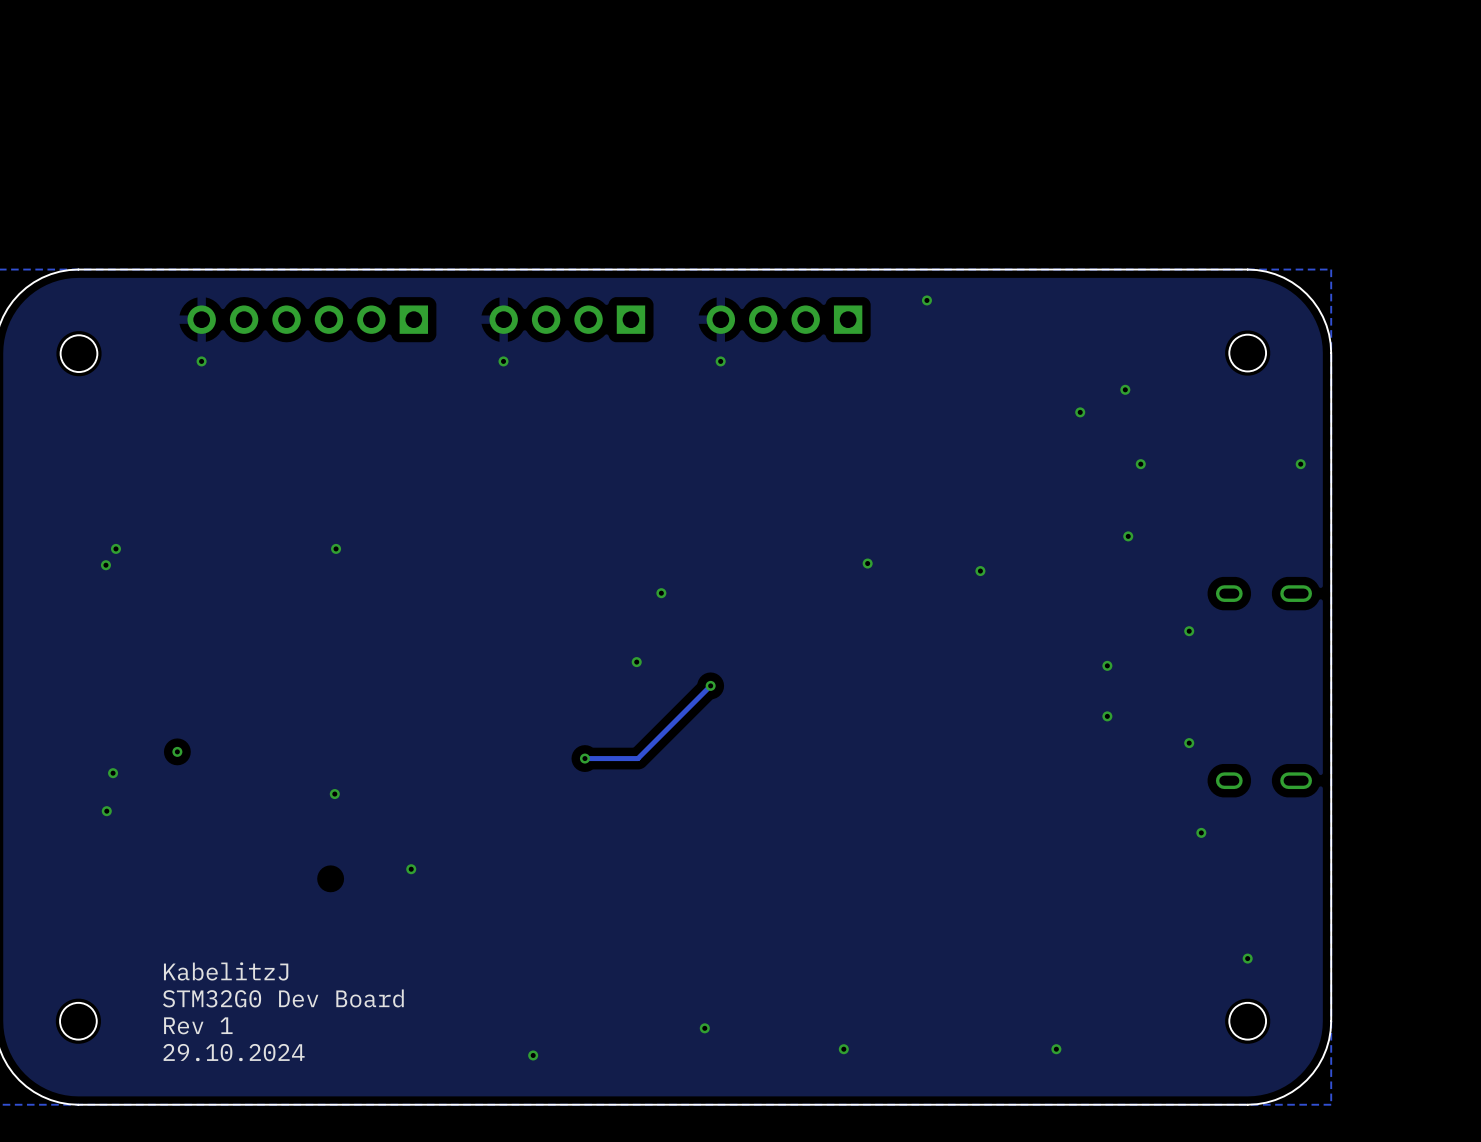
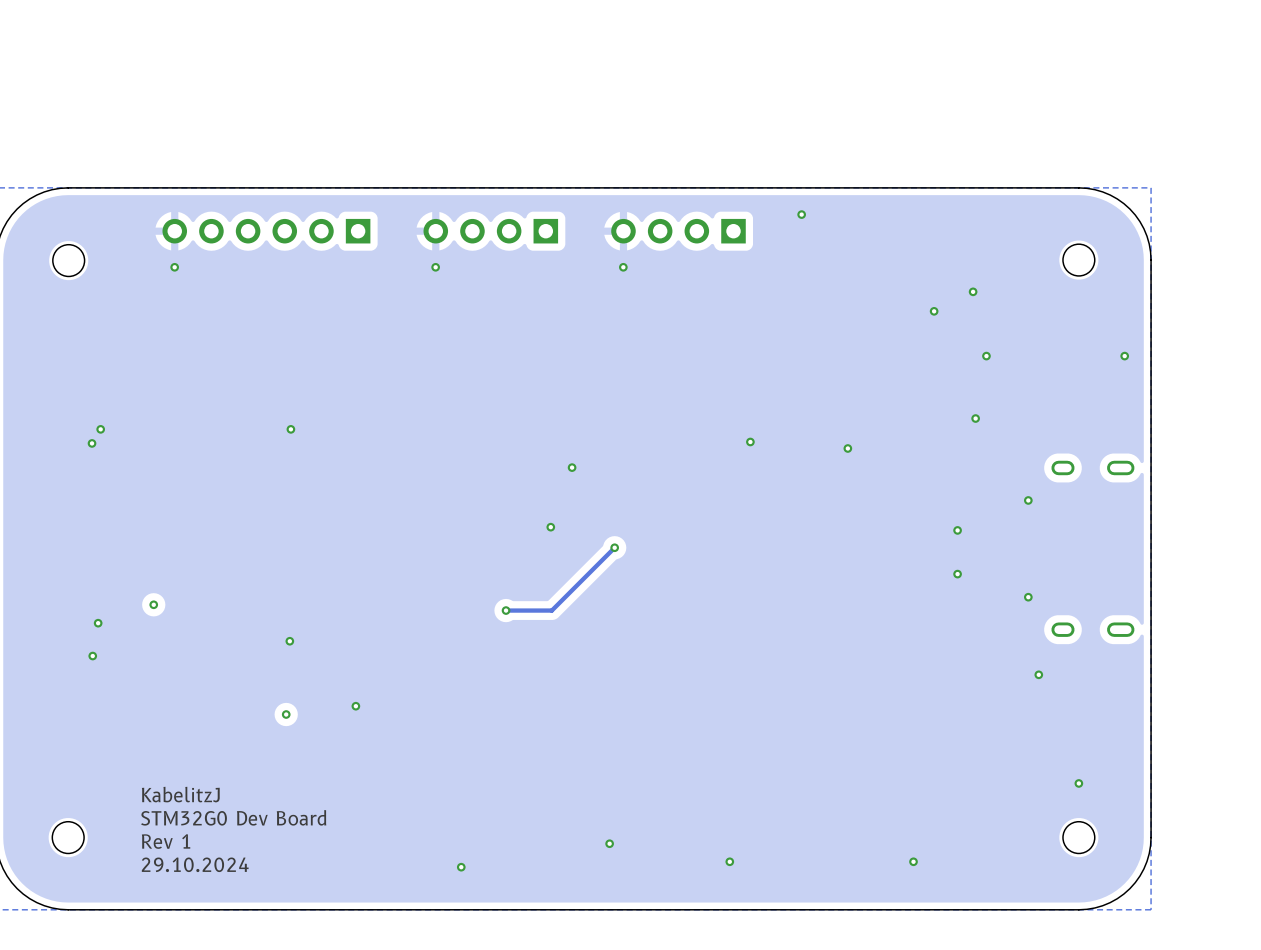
via: none -> (286, 714)

